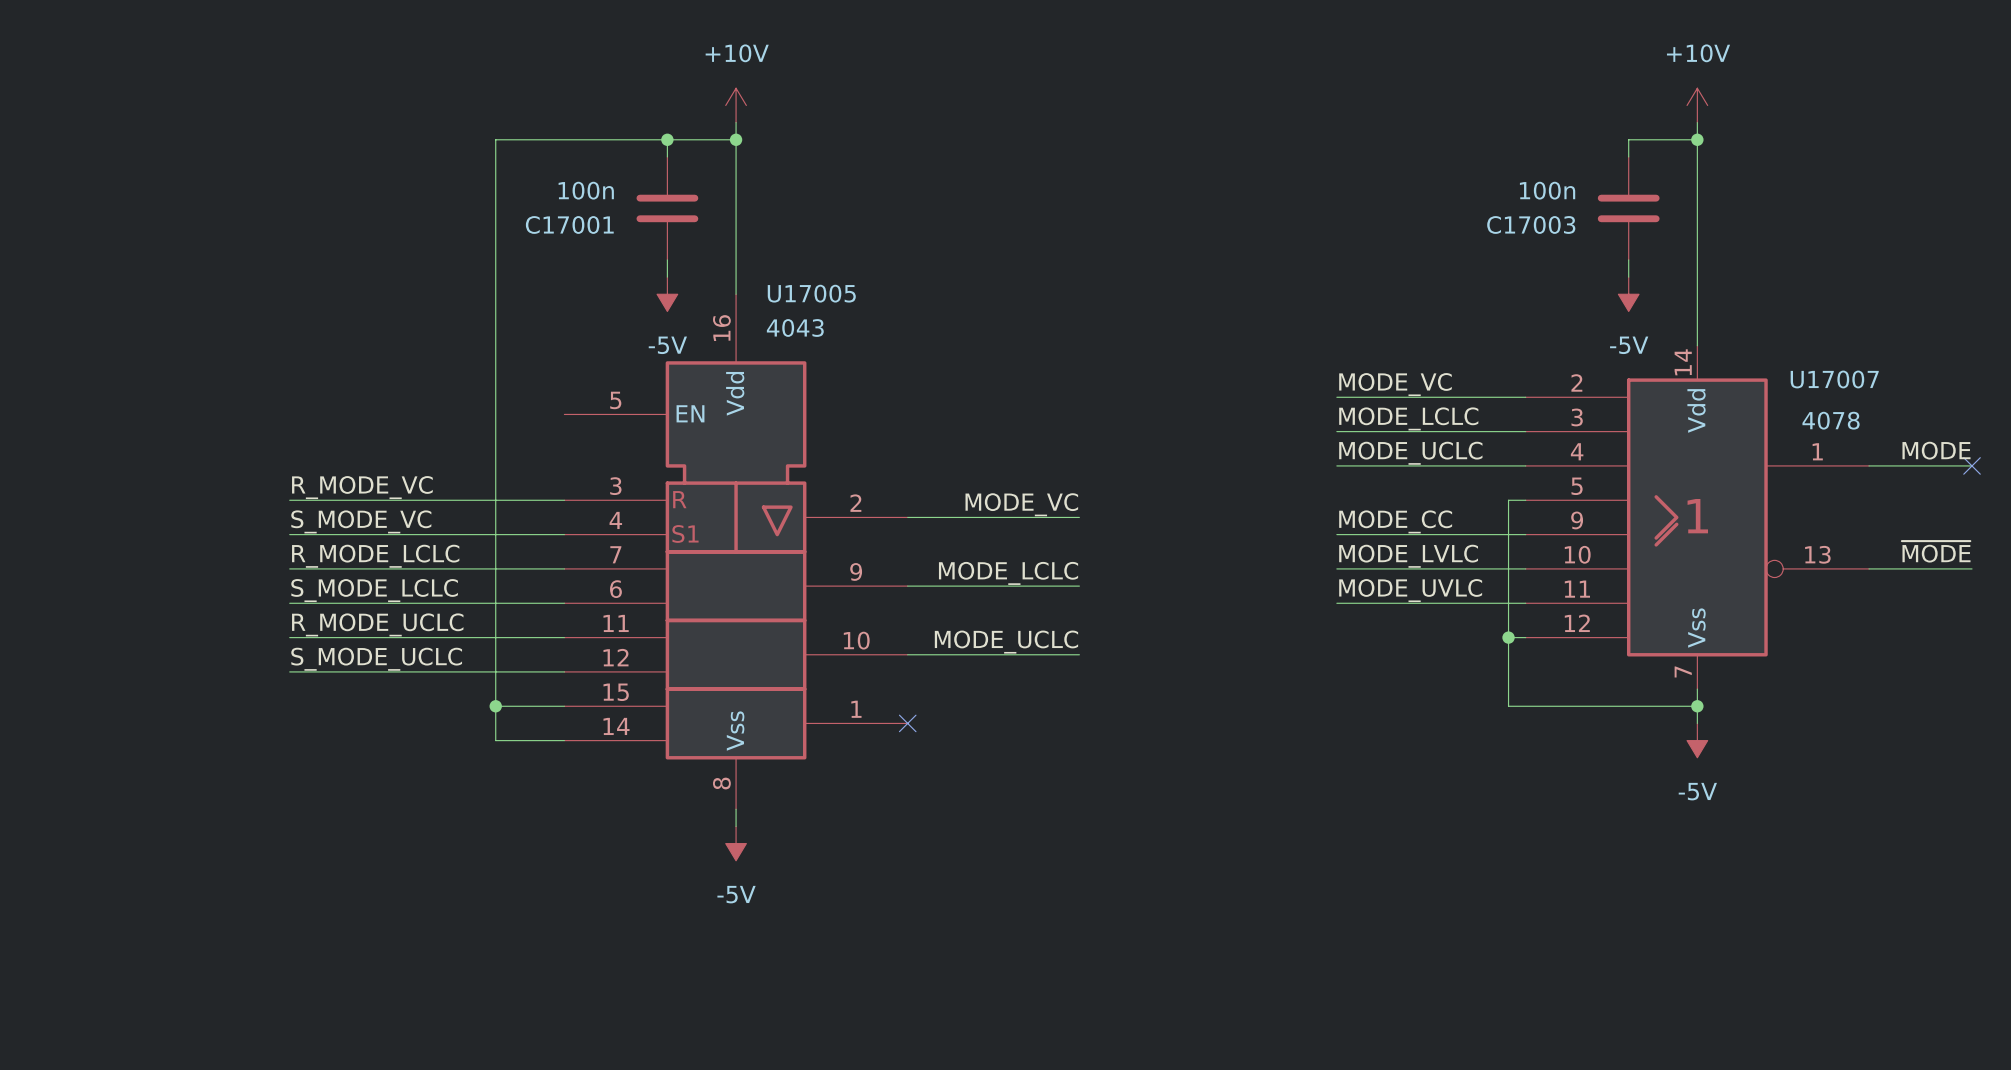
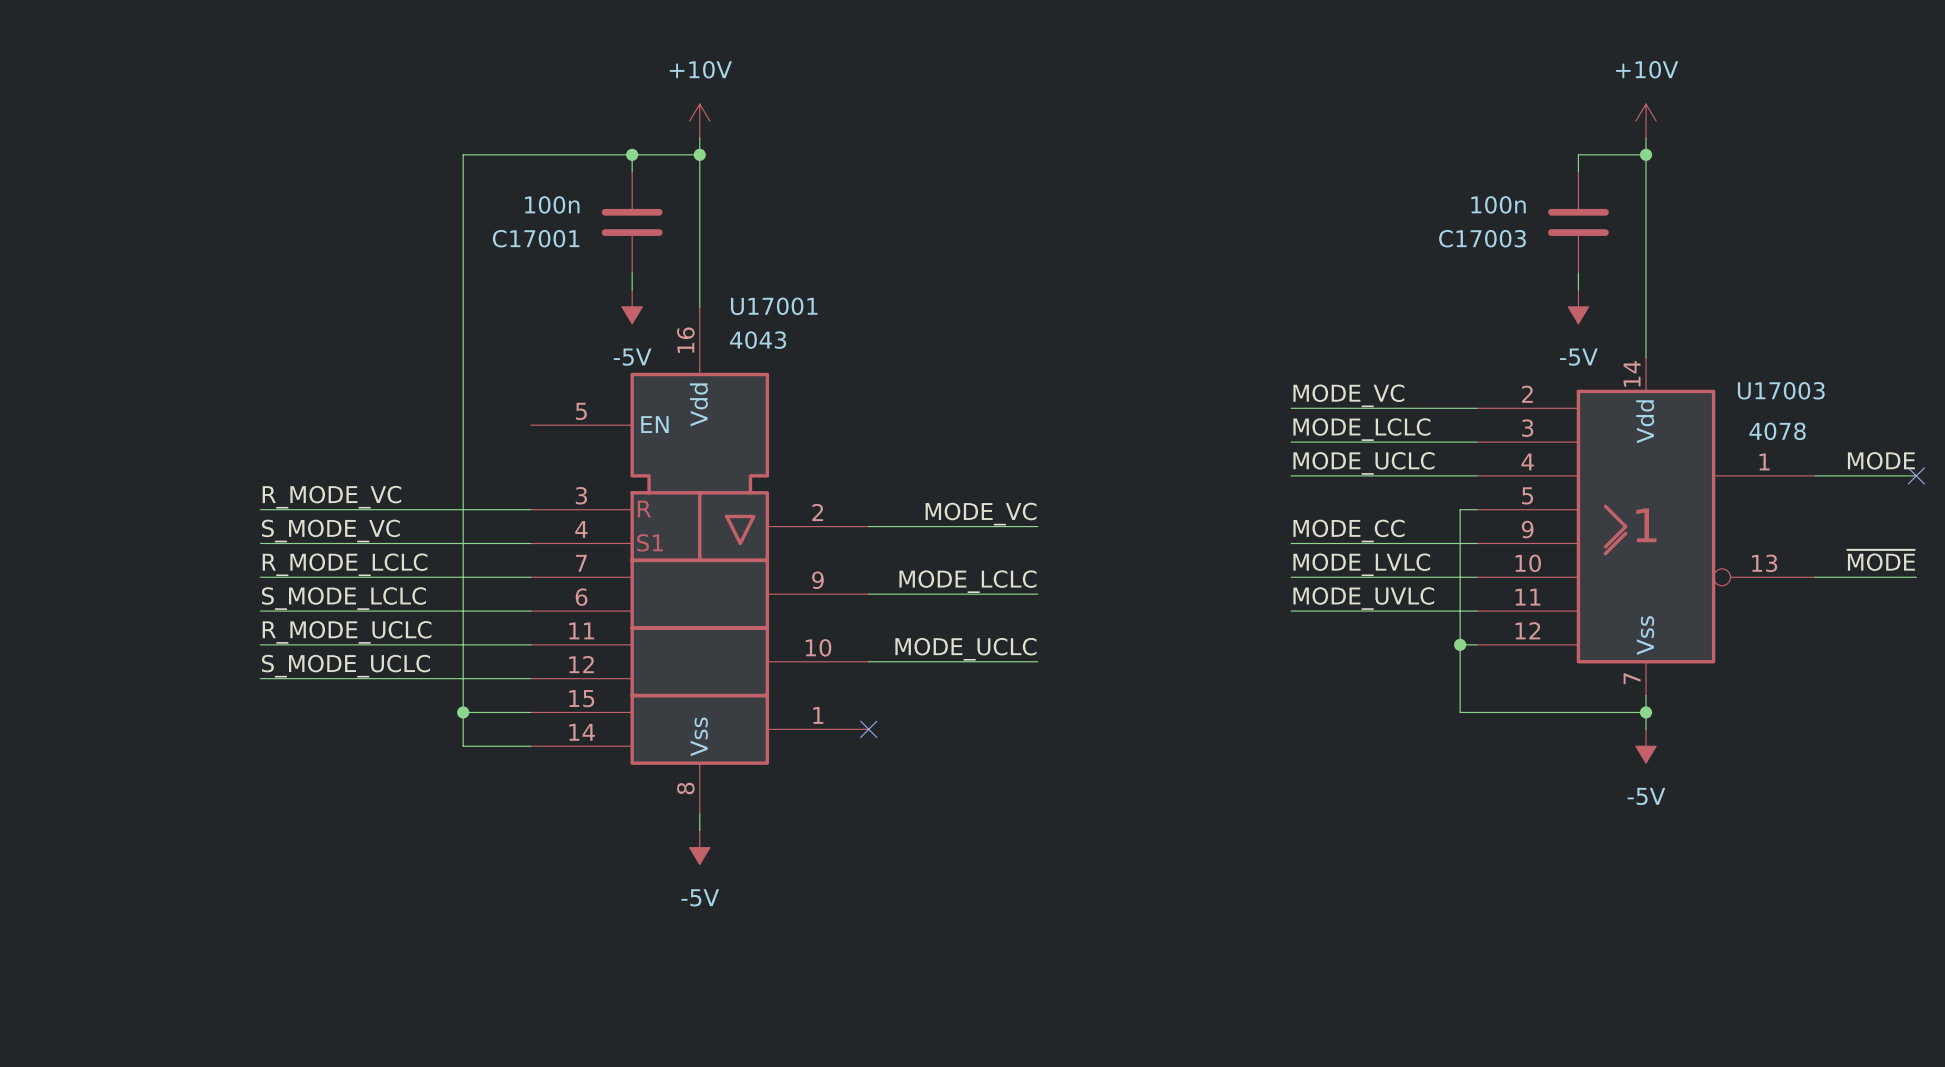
U17005 name: U17005 (811, 293) -> U17001 (774, 306)
U17007 name: U17007 (1834, 379) -> U17003 (1781, 390)

